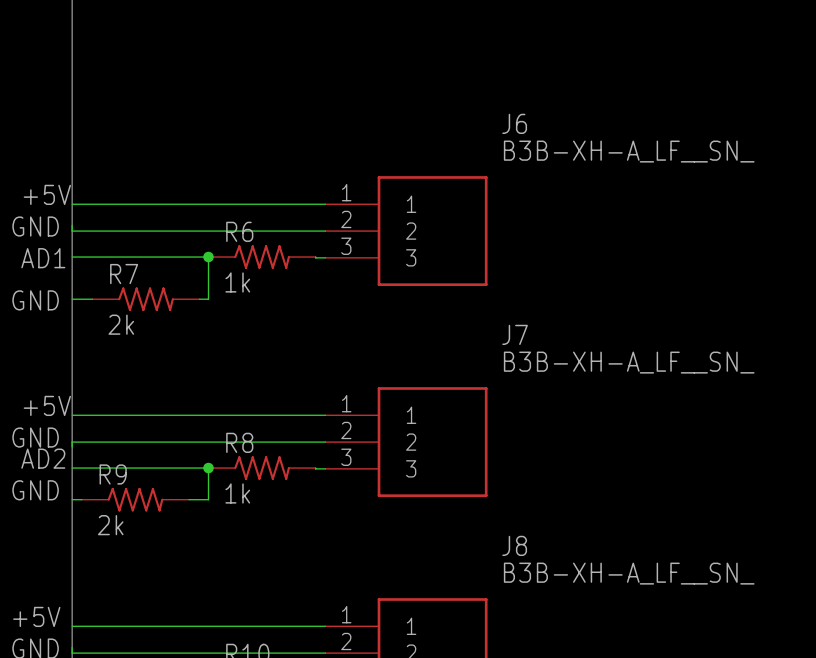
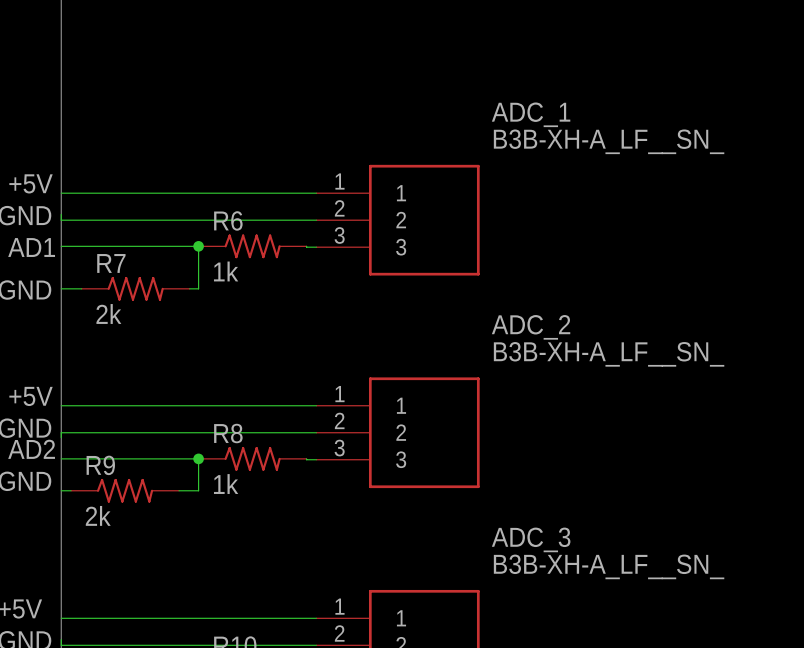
J6 name: J6 (514, 123) -> ADC_1 (531, 114)
J7 name: J7 (515, 334) -> ADC_2 (531, 327)
J8 name: J8 (514, 545) -> ADC_3 (531, 539)

